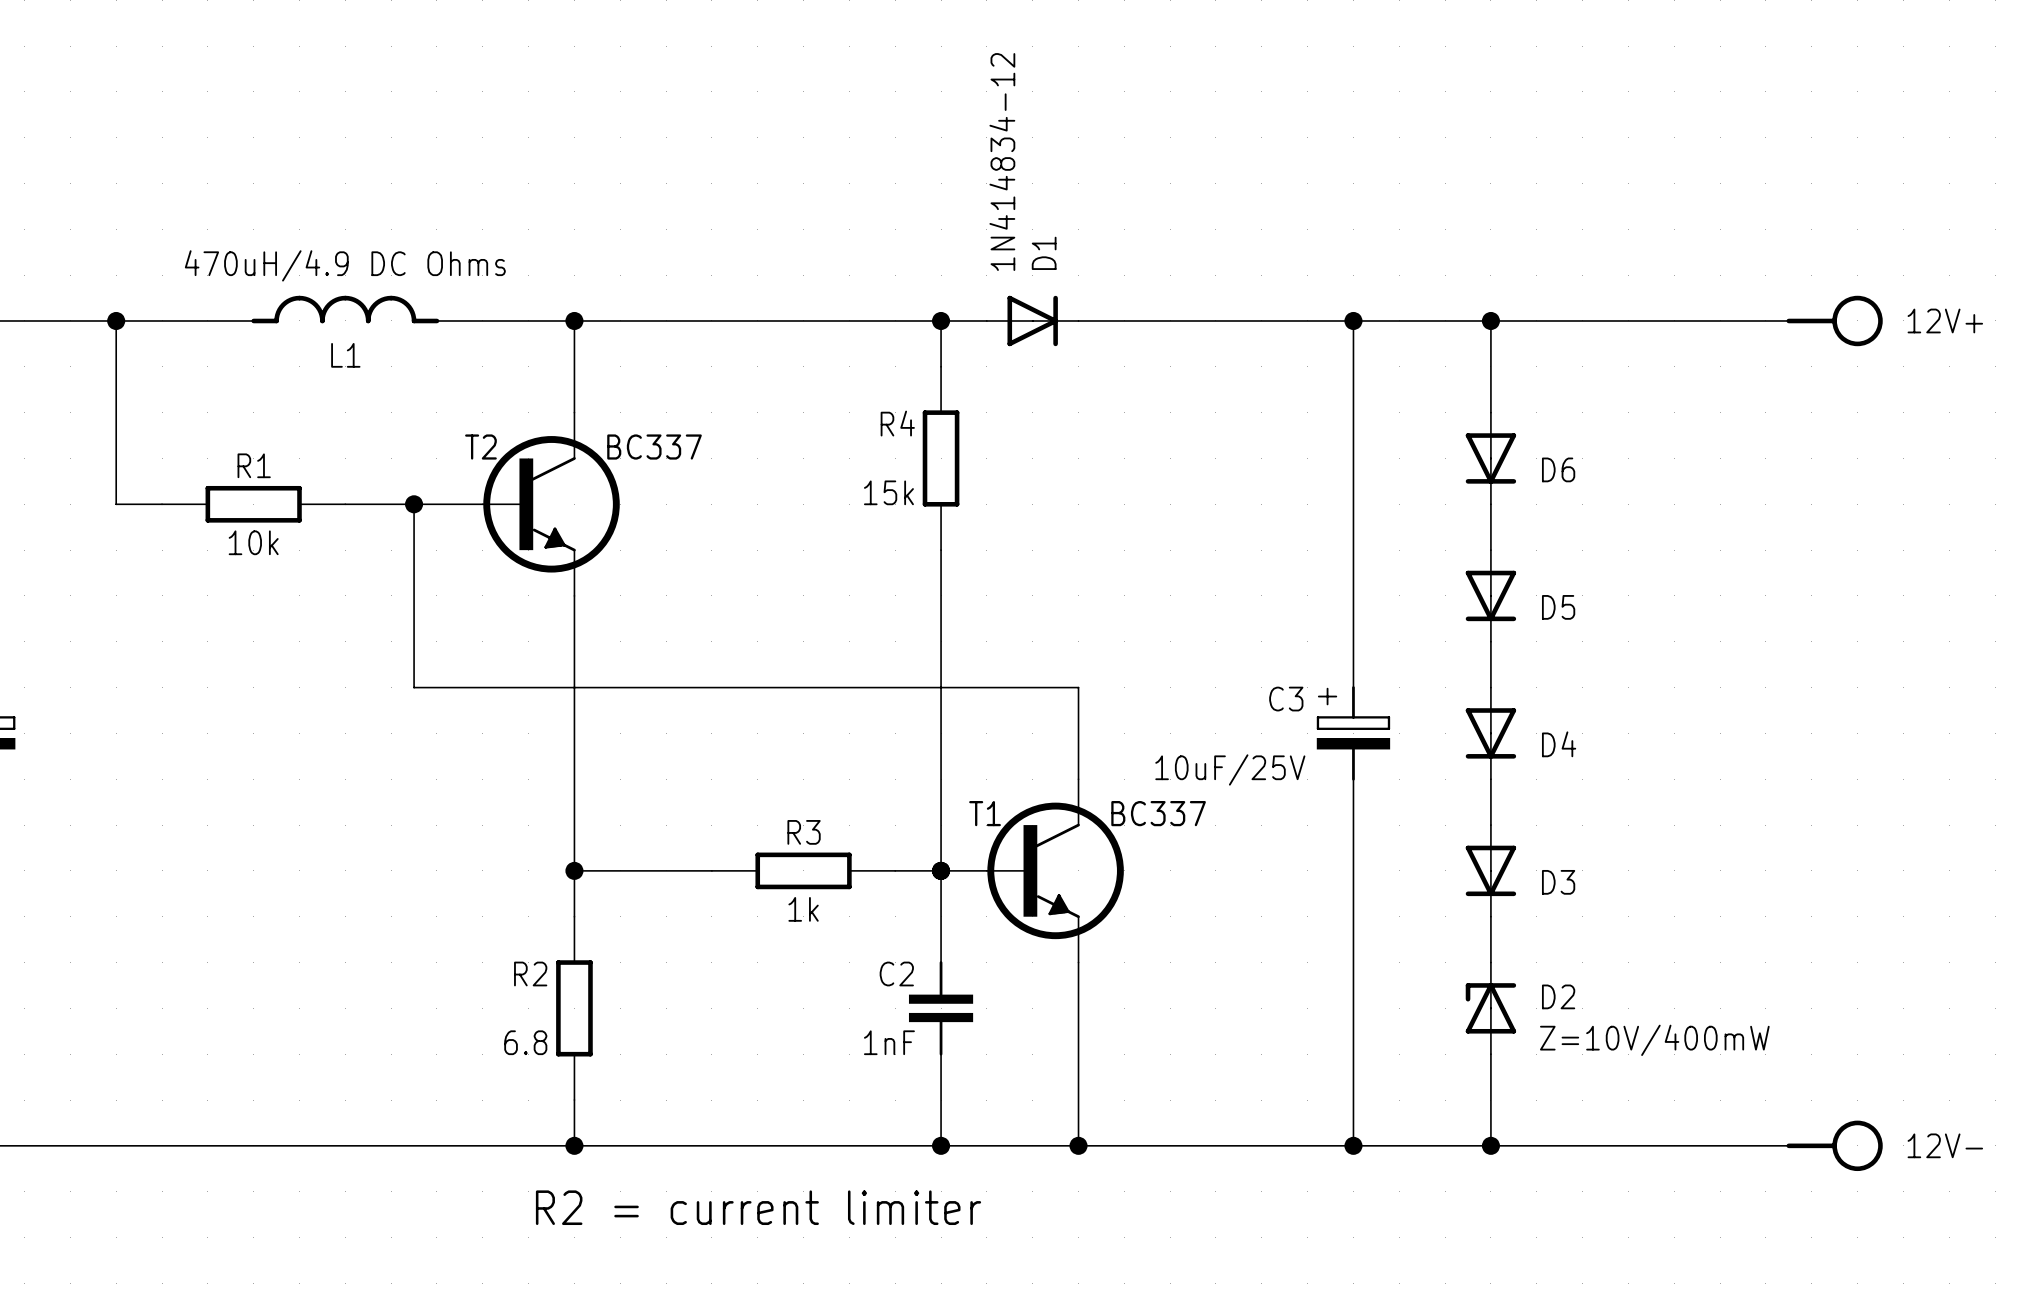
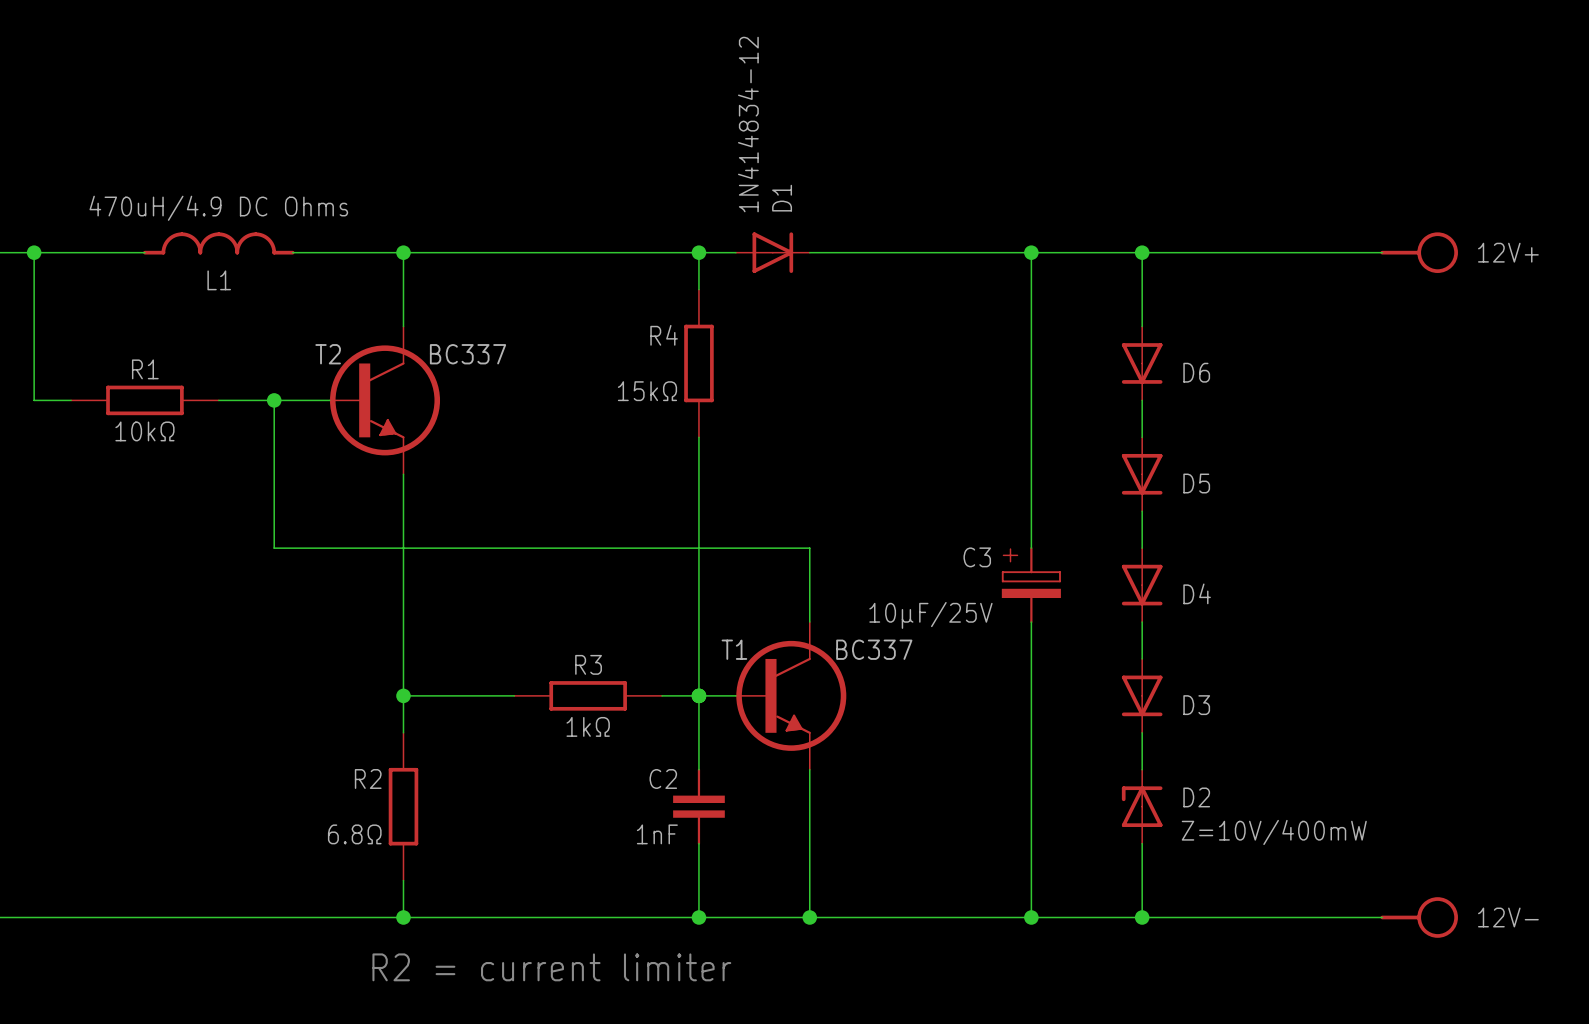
R4 value: 15k (888, 492) -> 15kΩ (647, 391)
R1 value: 10k (253, 542) -> 10kΩ (144, 431)
C3 value: 10uF/25V (1230, 769) -> 10μF/25V (930, 615)
R3 value: 1k (803, 909) -> 1kΩ (588, 726)
R2 value: 6.8 (525, 1042) -> 6.8Ω (354, 834)

